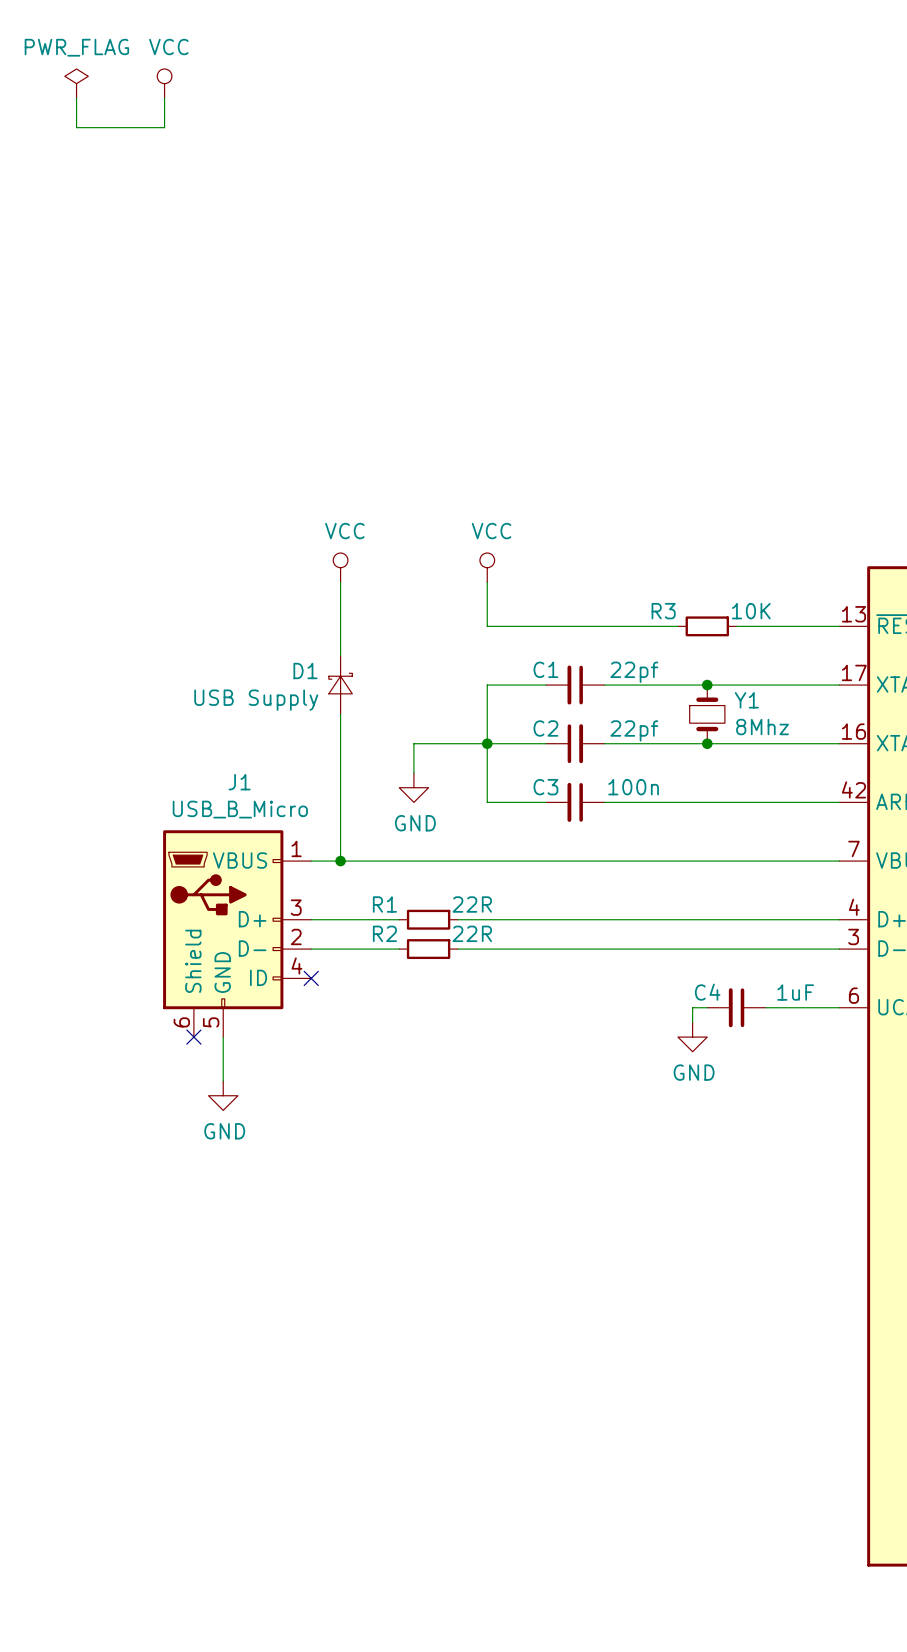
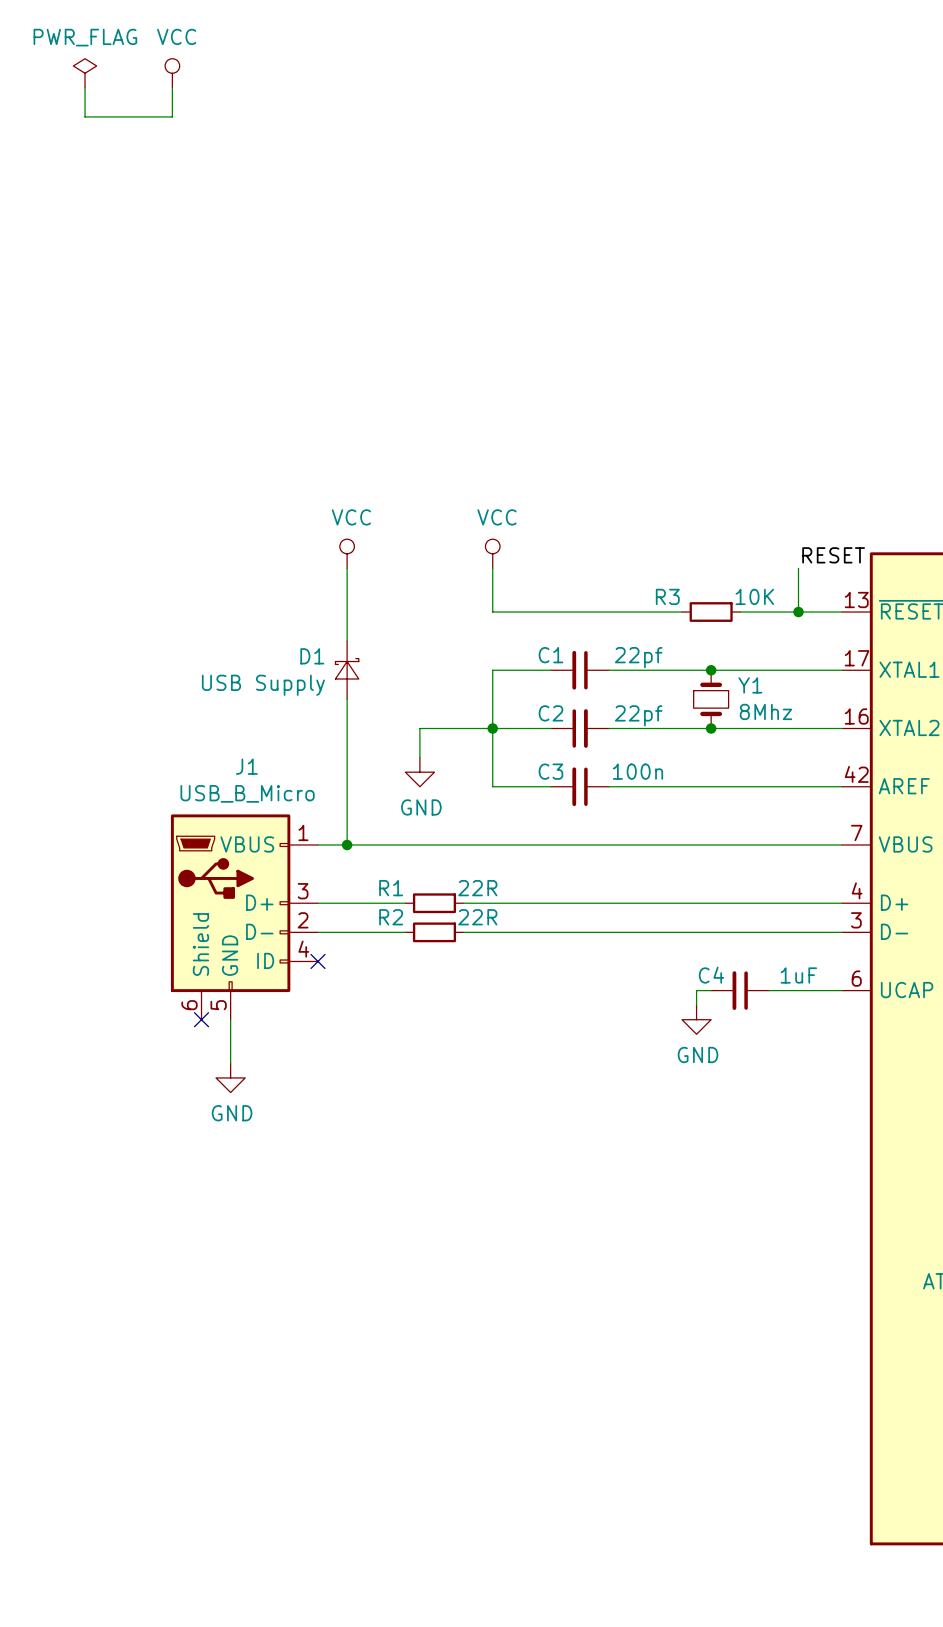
label: none -> RESET (833, 555)
wire: none -> (798, 568) (798, 612)
junction: none -> (798, 612)

